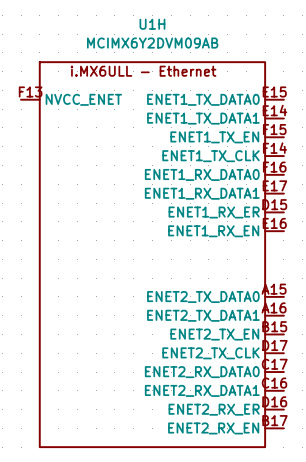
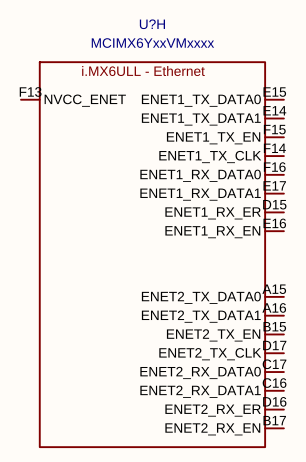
U1H name: U1H (152, 24) -> U?H (152, 24)
U1H value: MCIMX6Y2DVM09AB (152, 43) -> MCIMX6YxxVMxxxx (152, 43)

